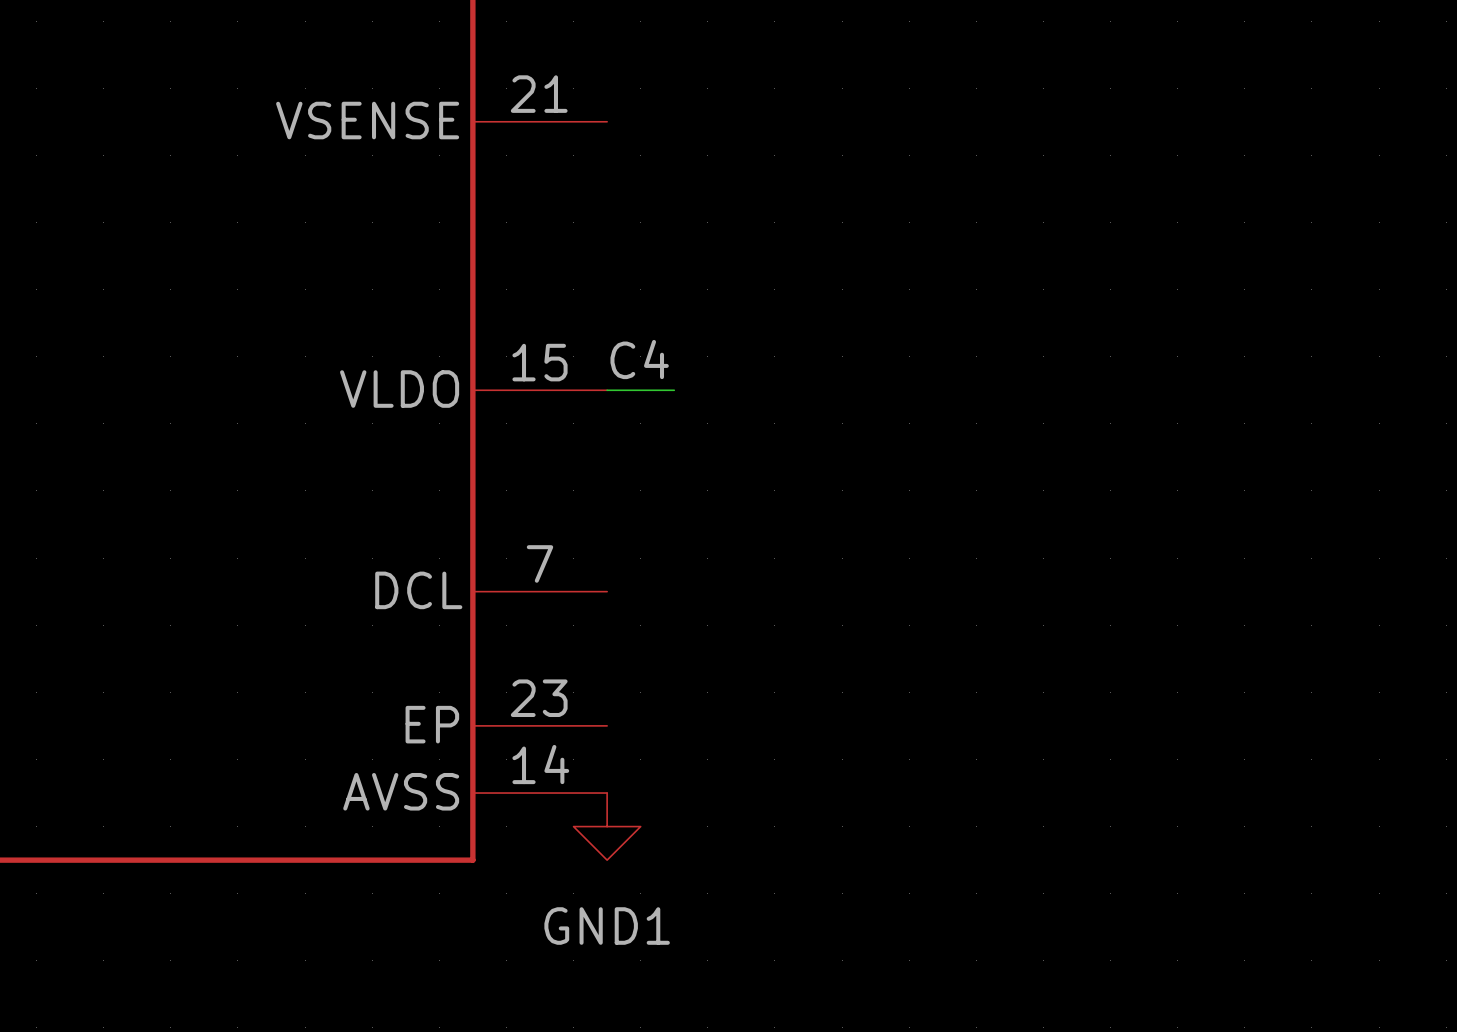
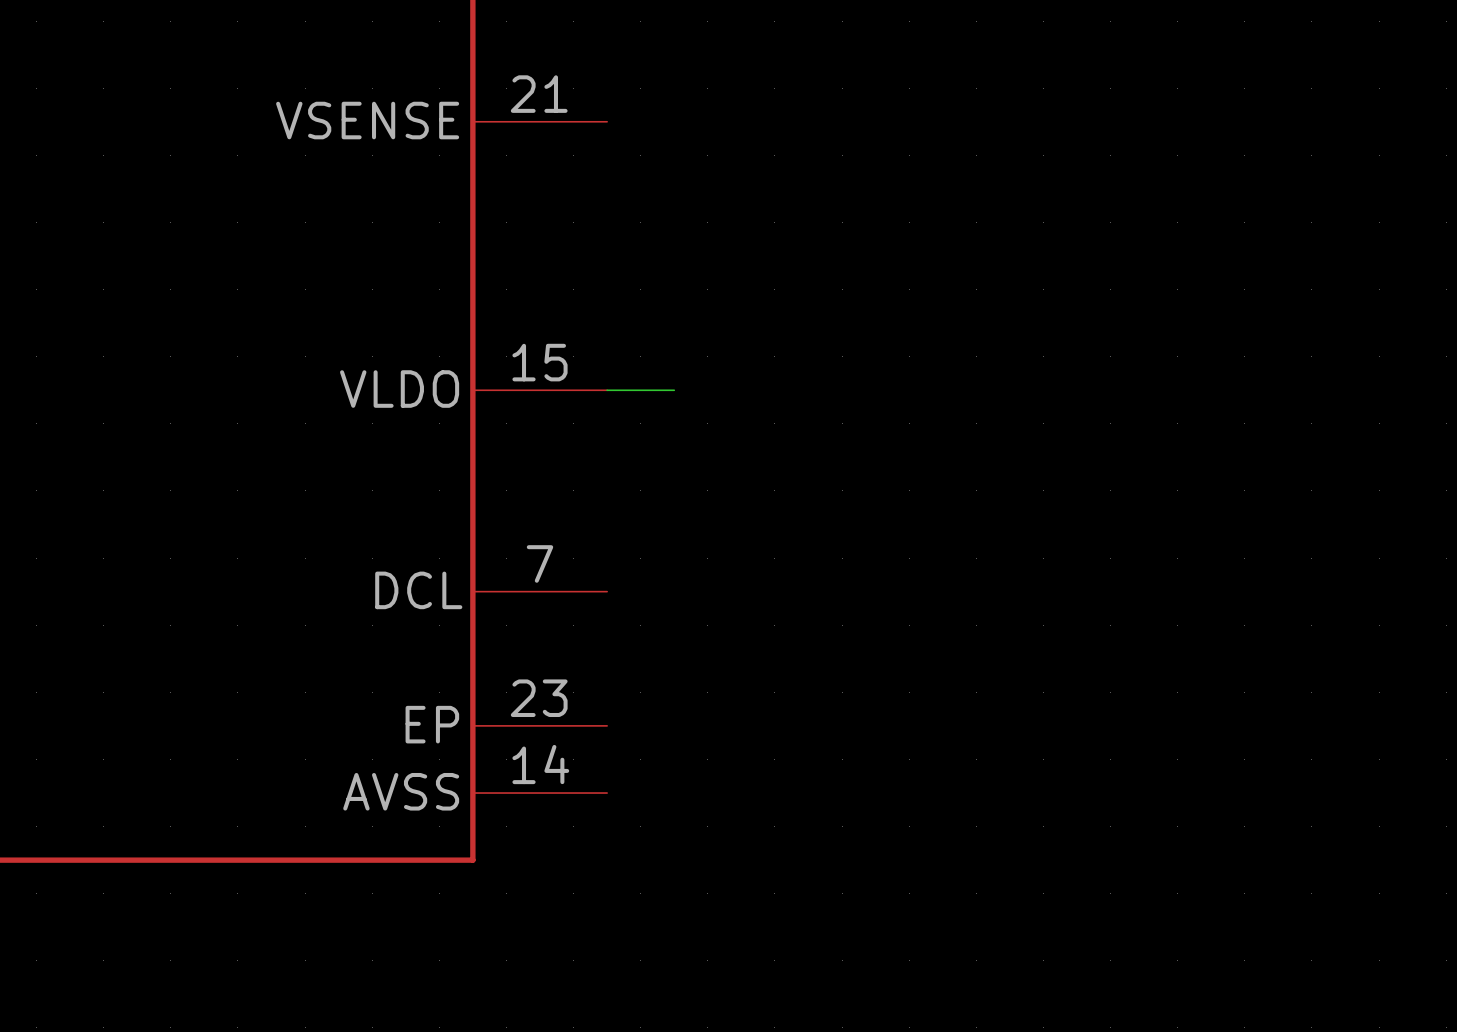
label: C4 (639, 359) -> none
power symbol: GND1 (607, 826) -> none

